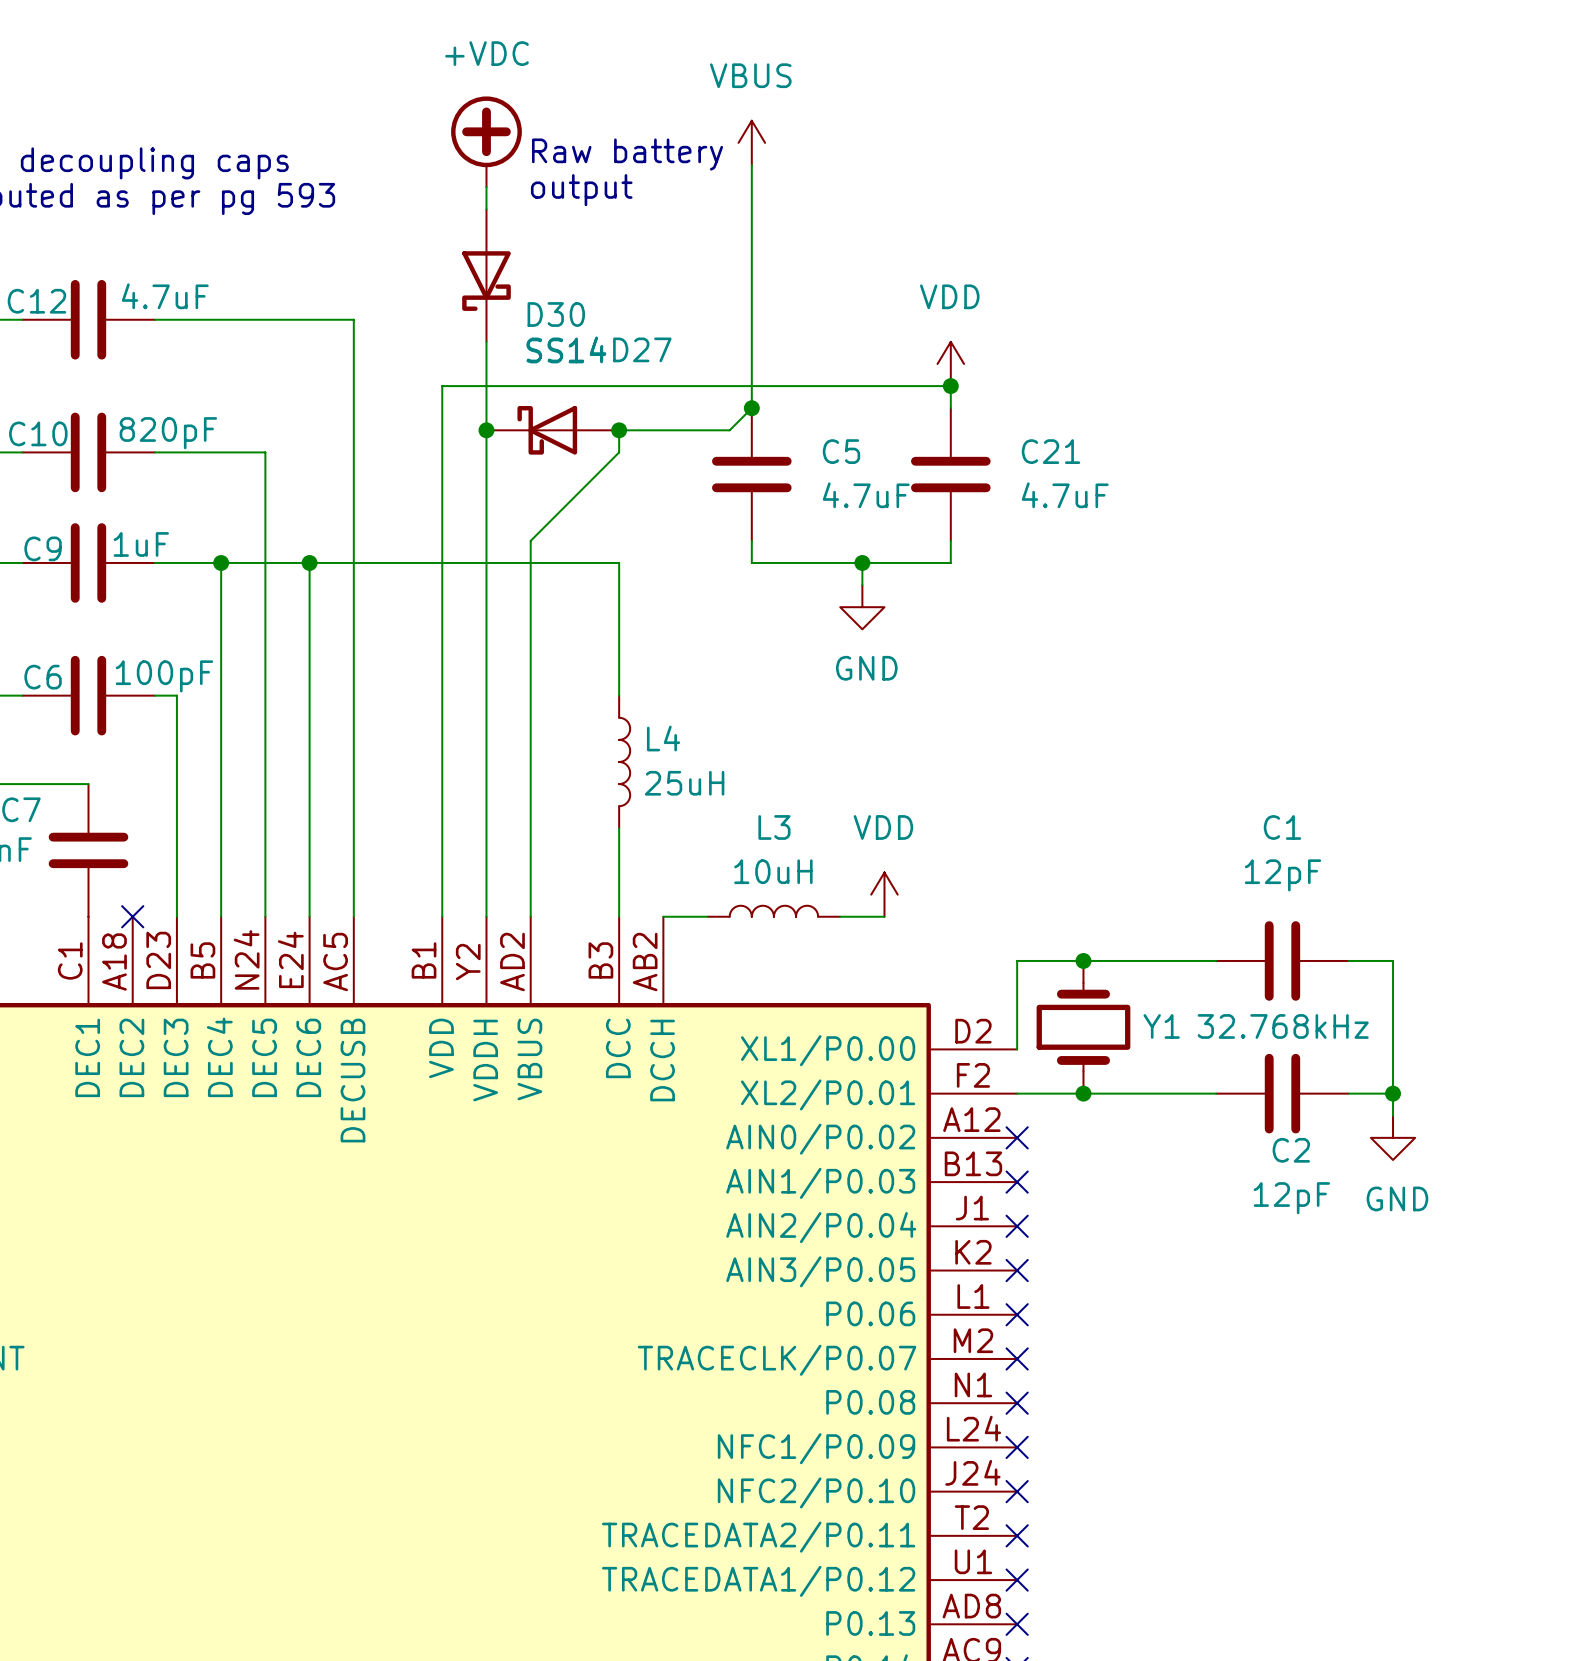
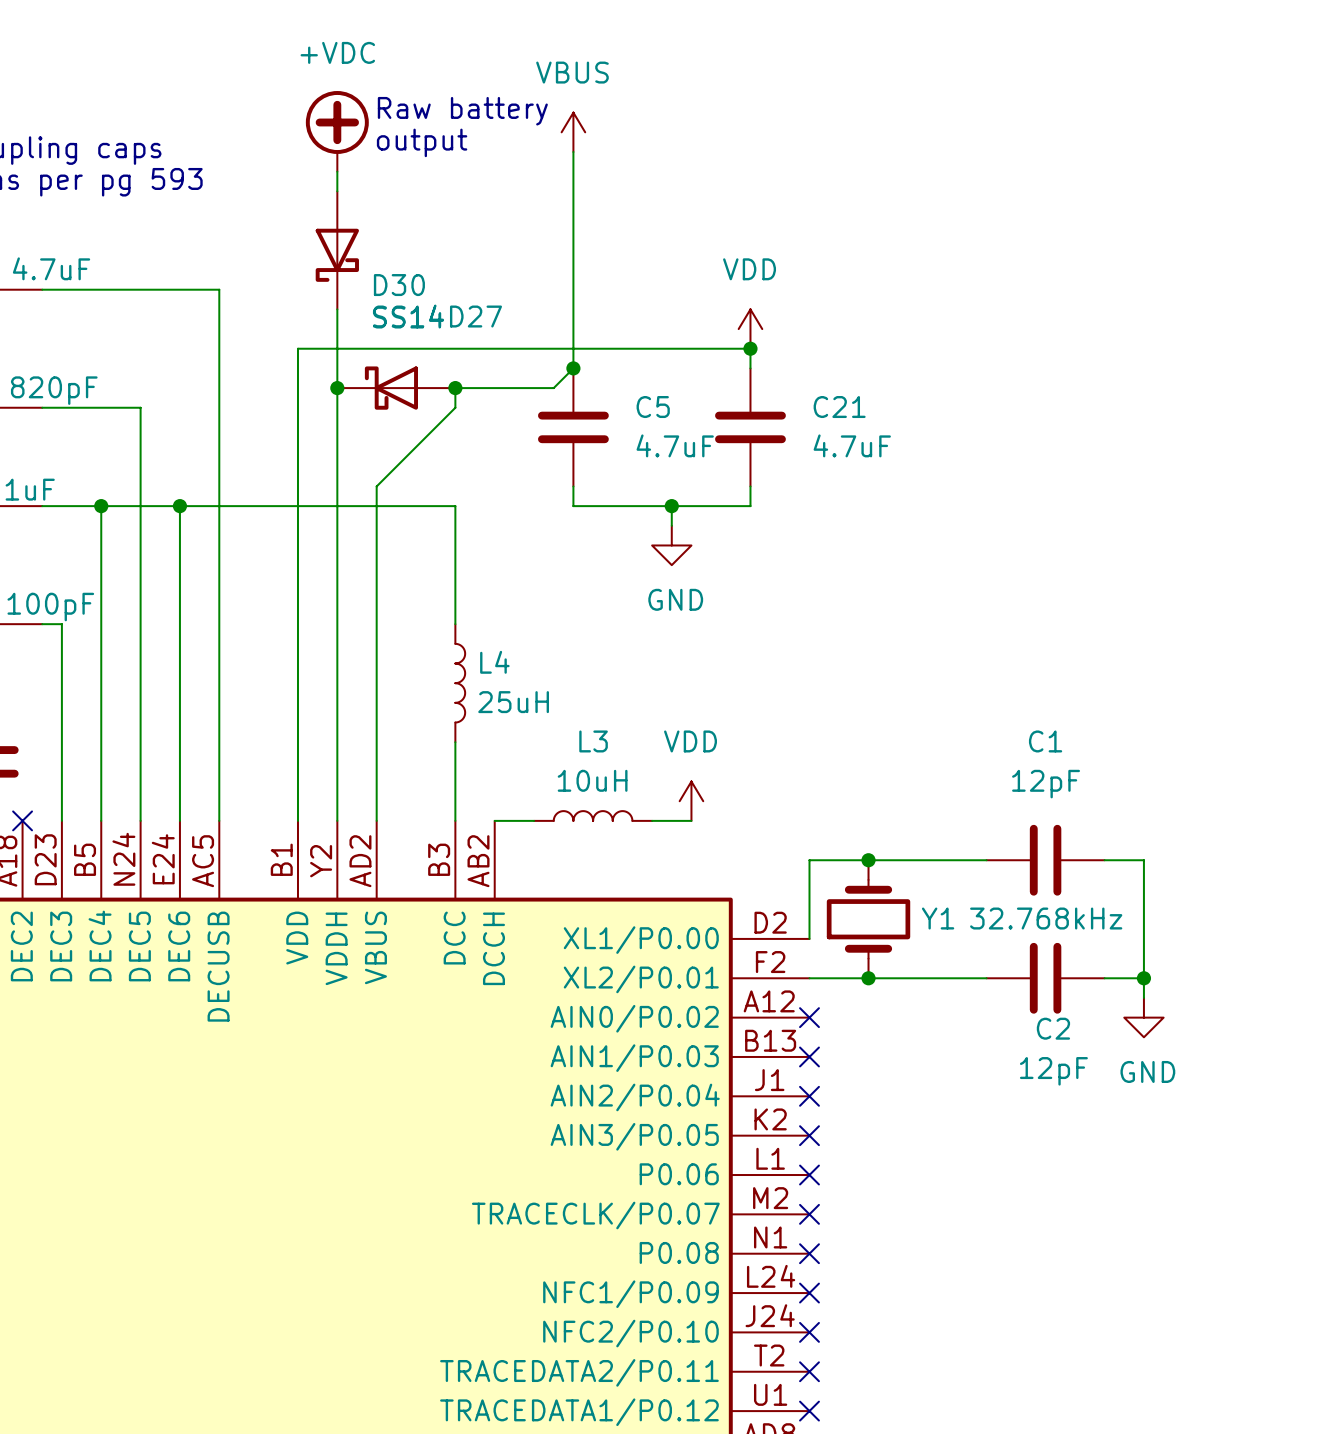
text: none -> Raw battery (462, 111)
text: Raw battery (627, 154) -> output (422, 142)
text: output (581, 190) -> none

